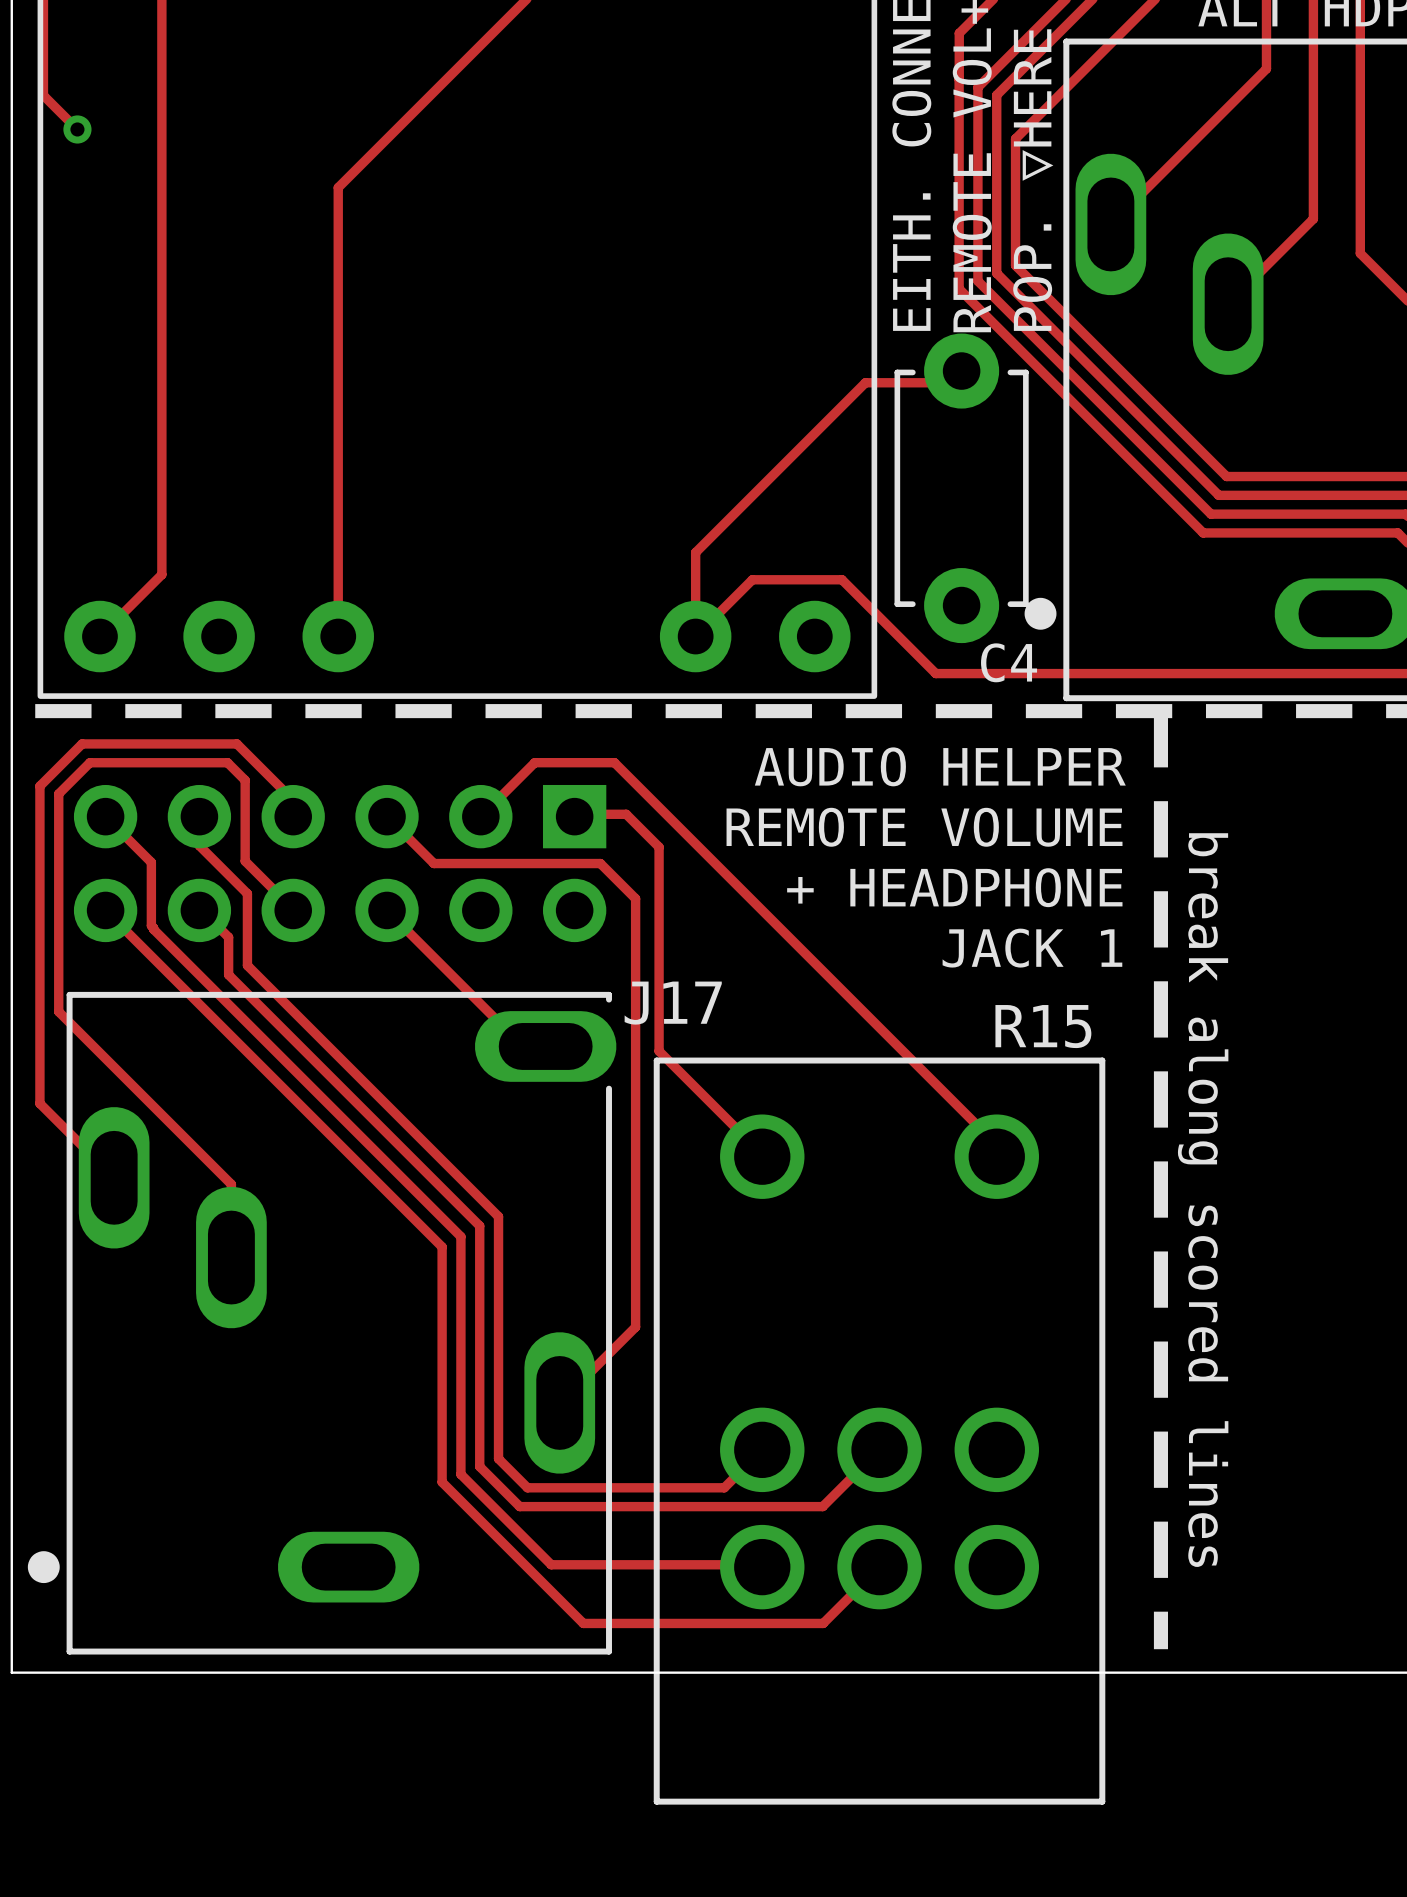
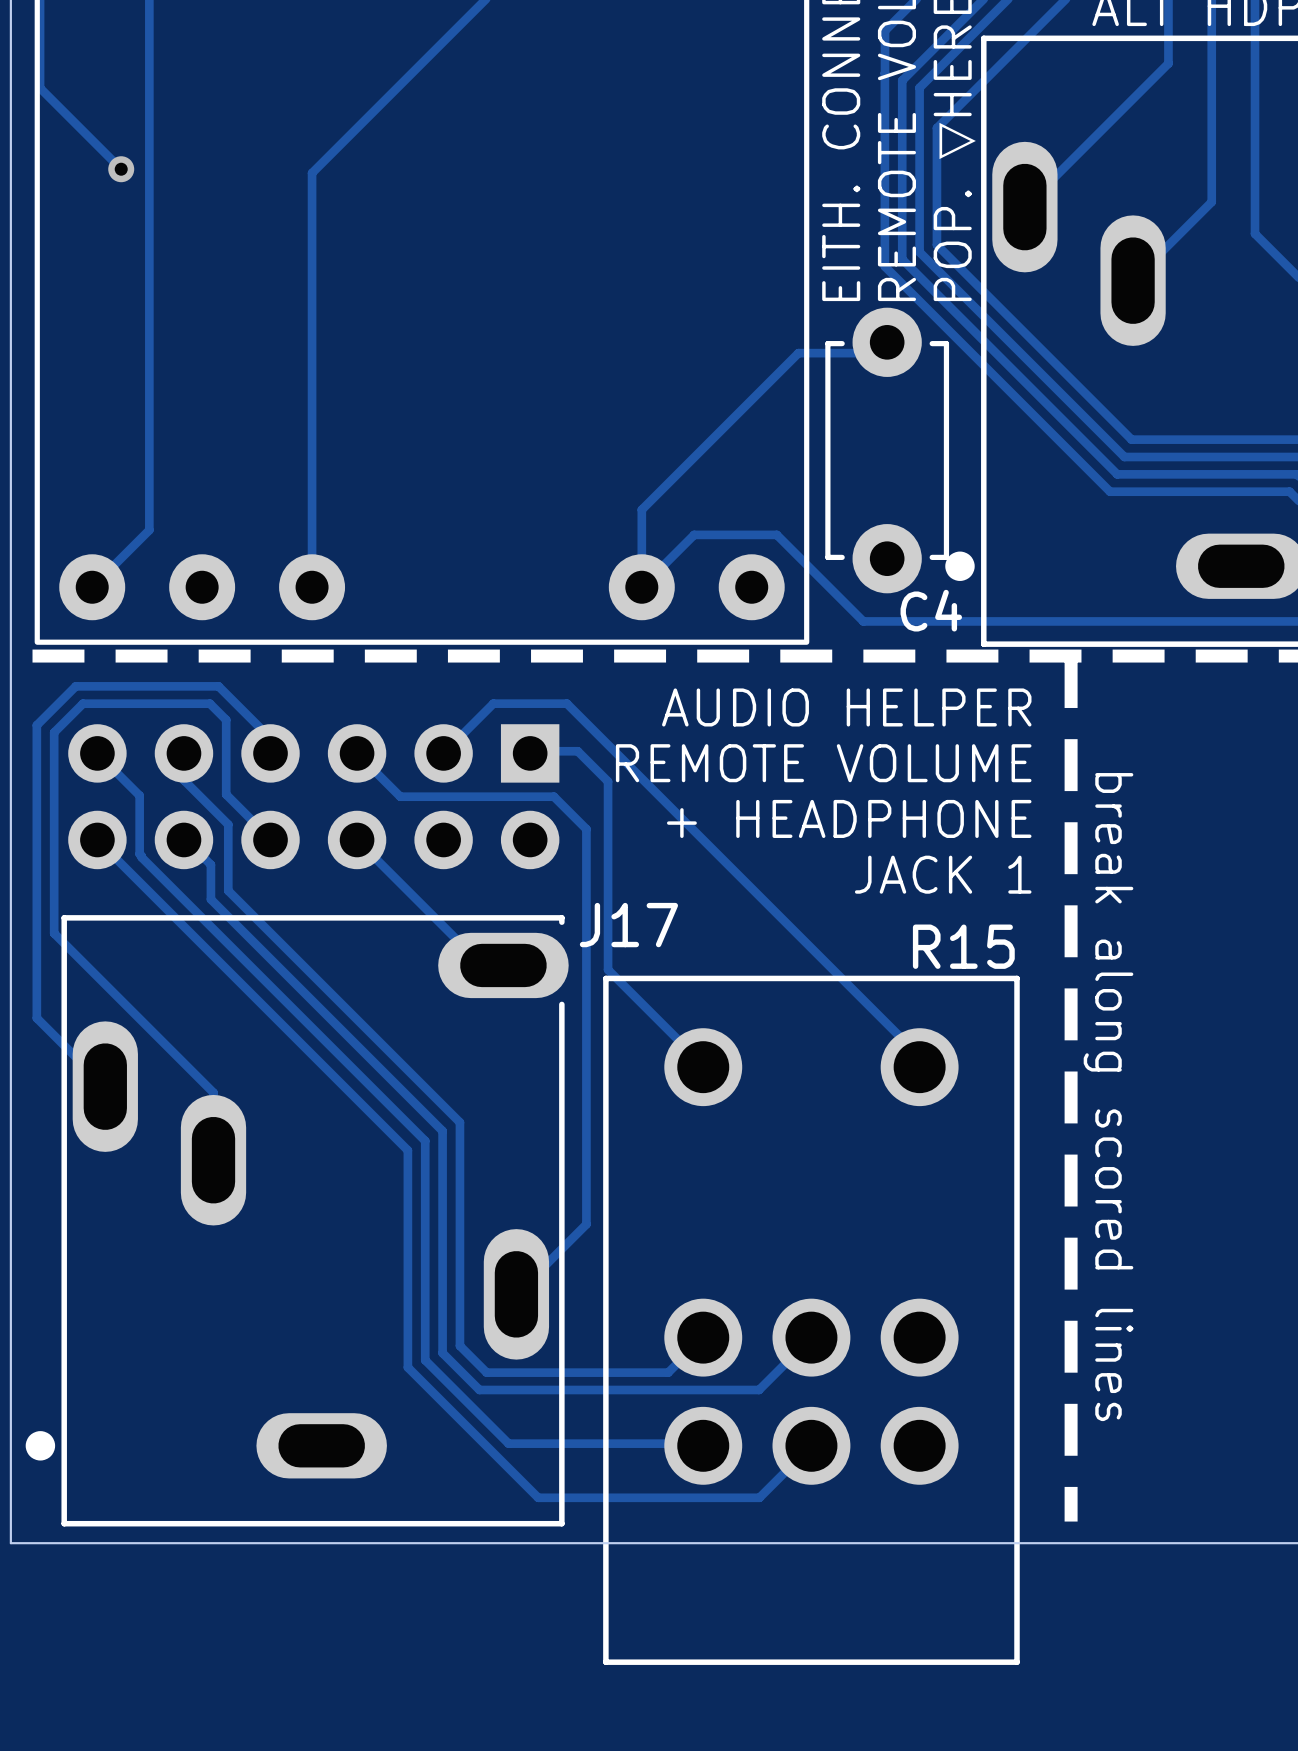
track: none -> (71, 119) (121, 169)
via position: (77, 129) -> (121, 169)

